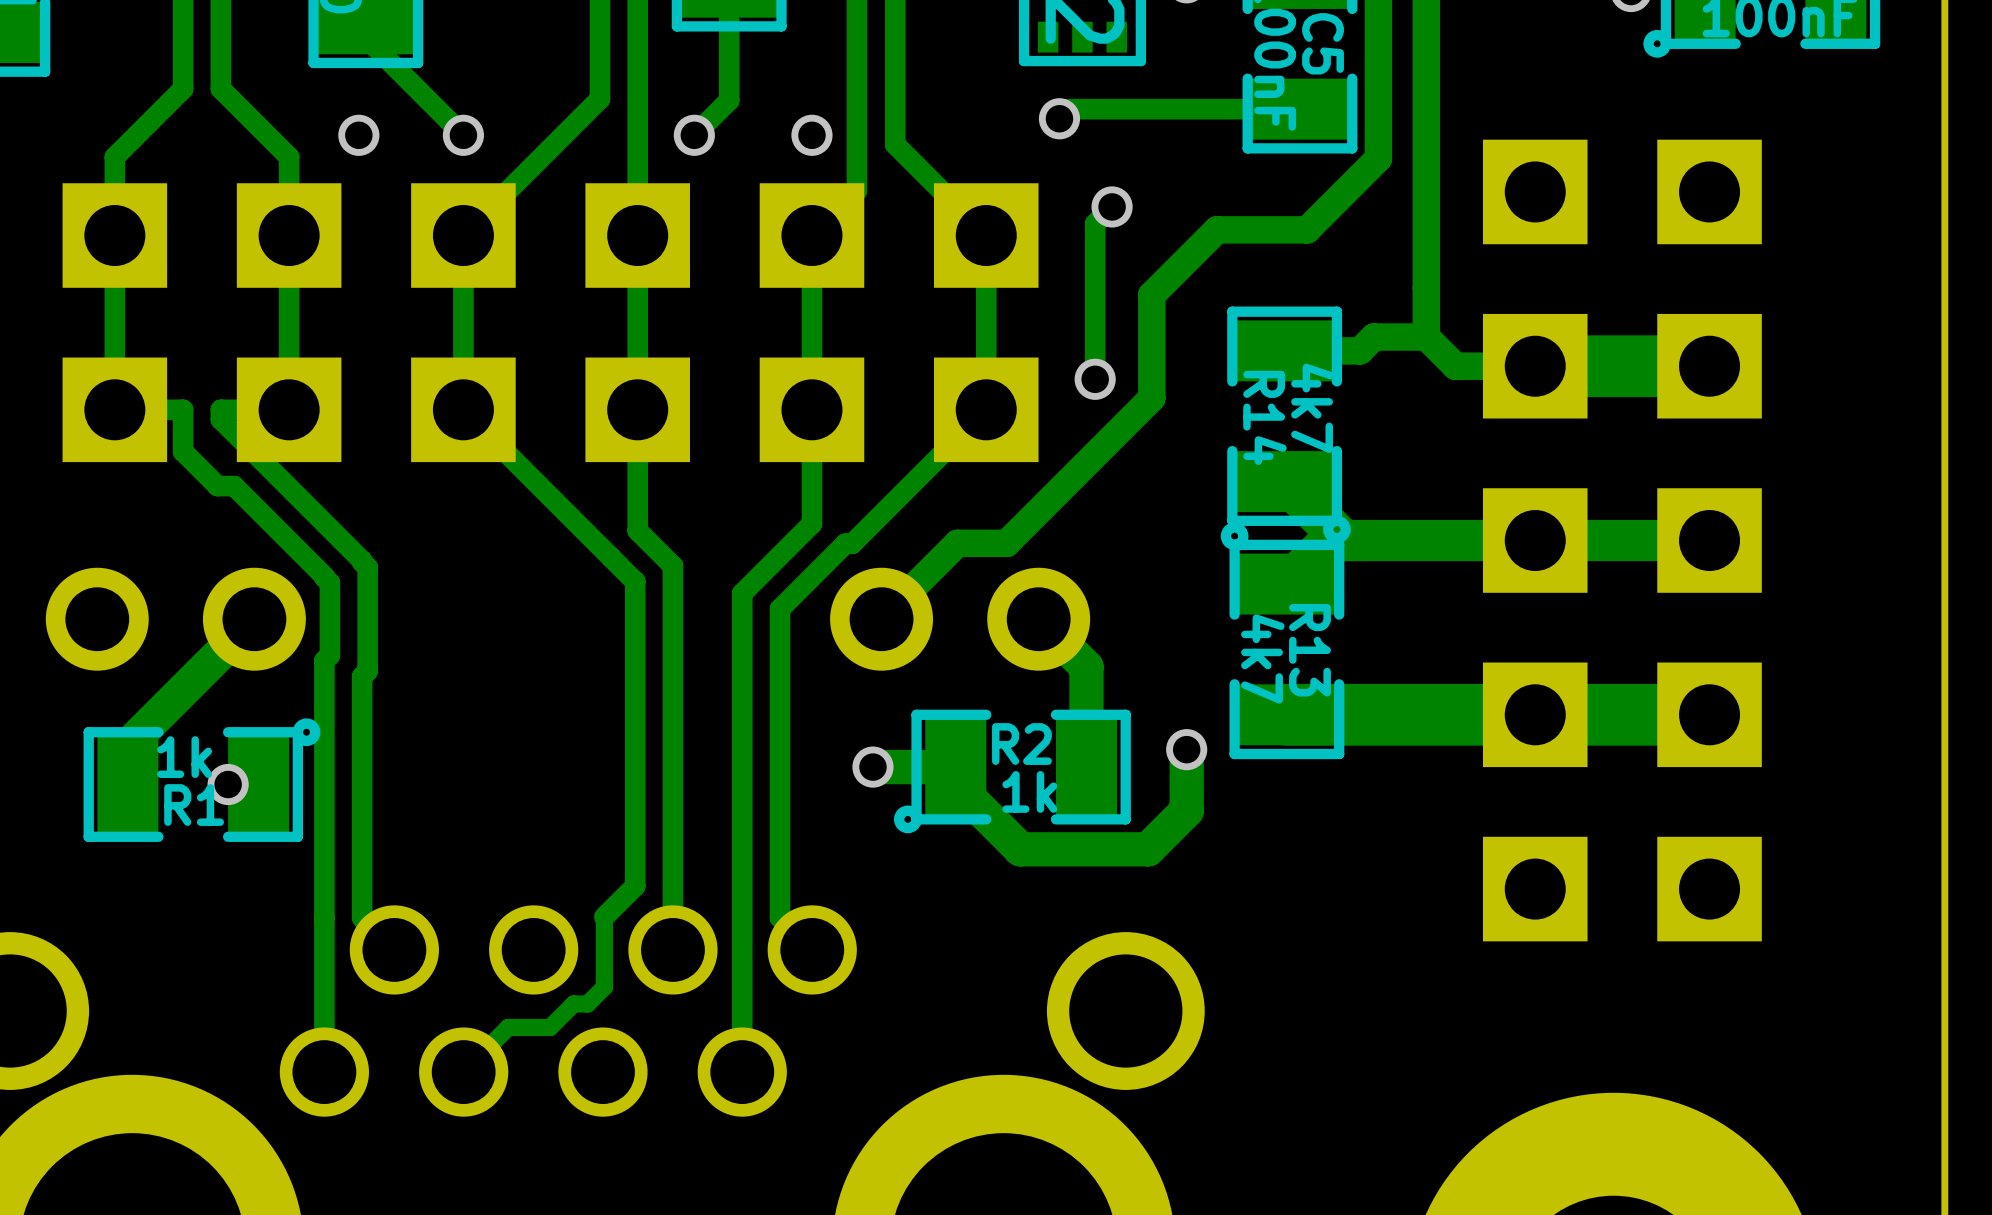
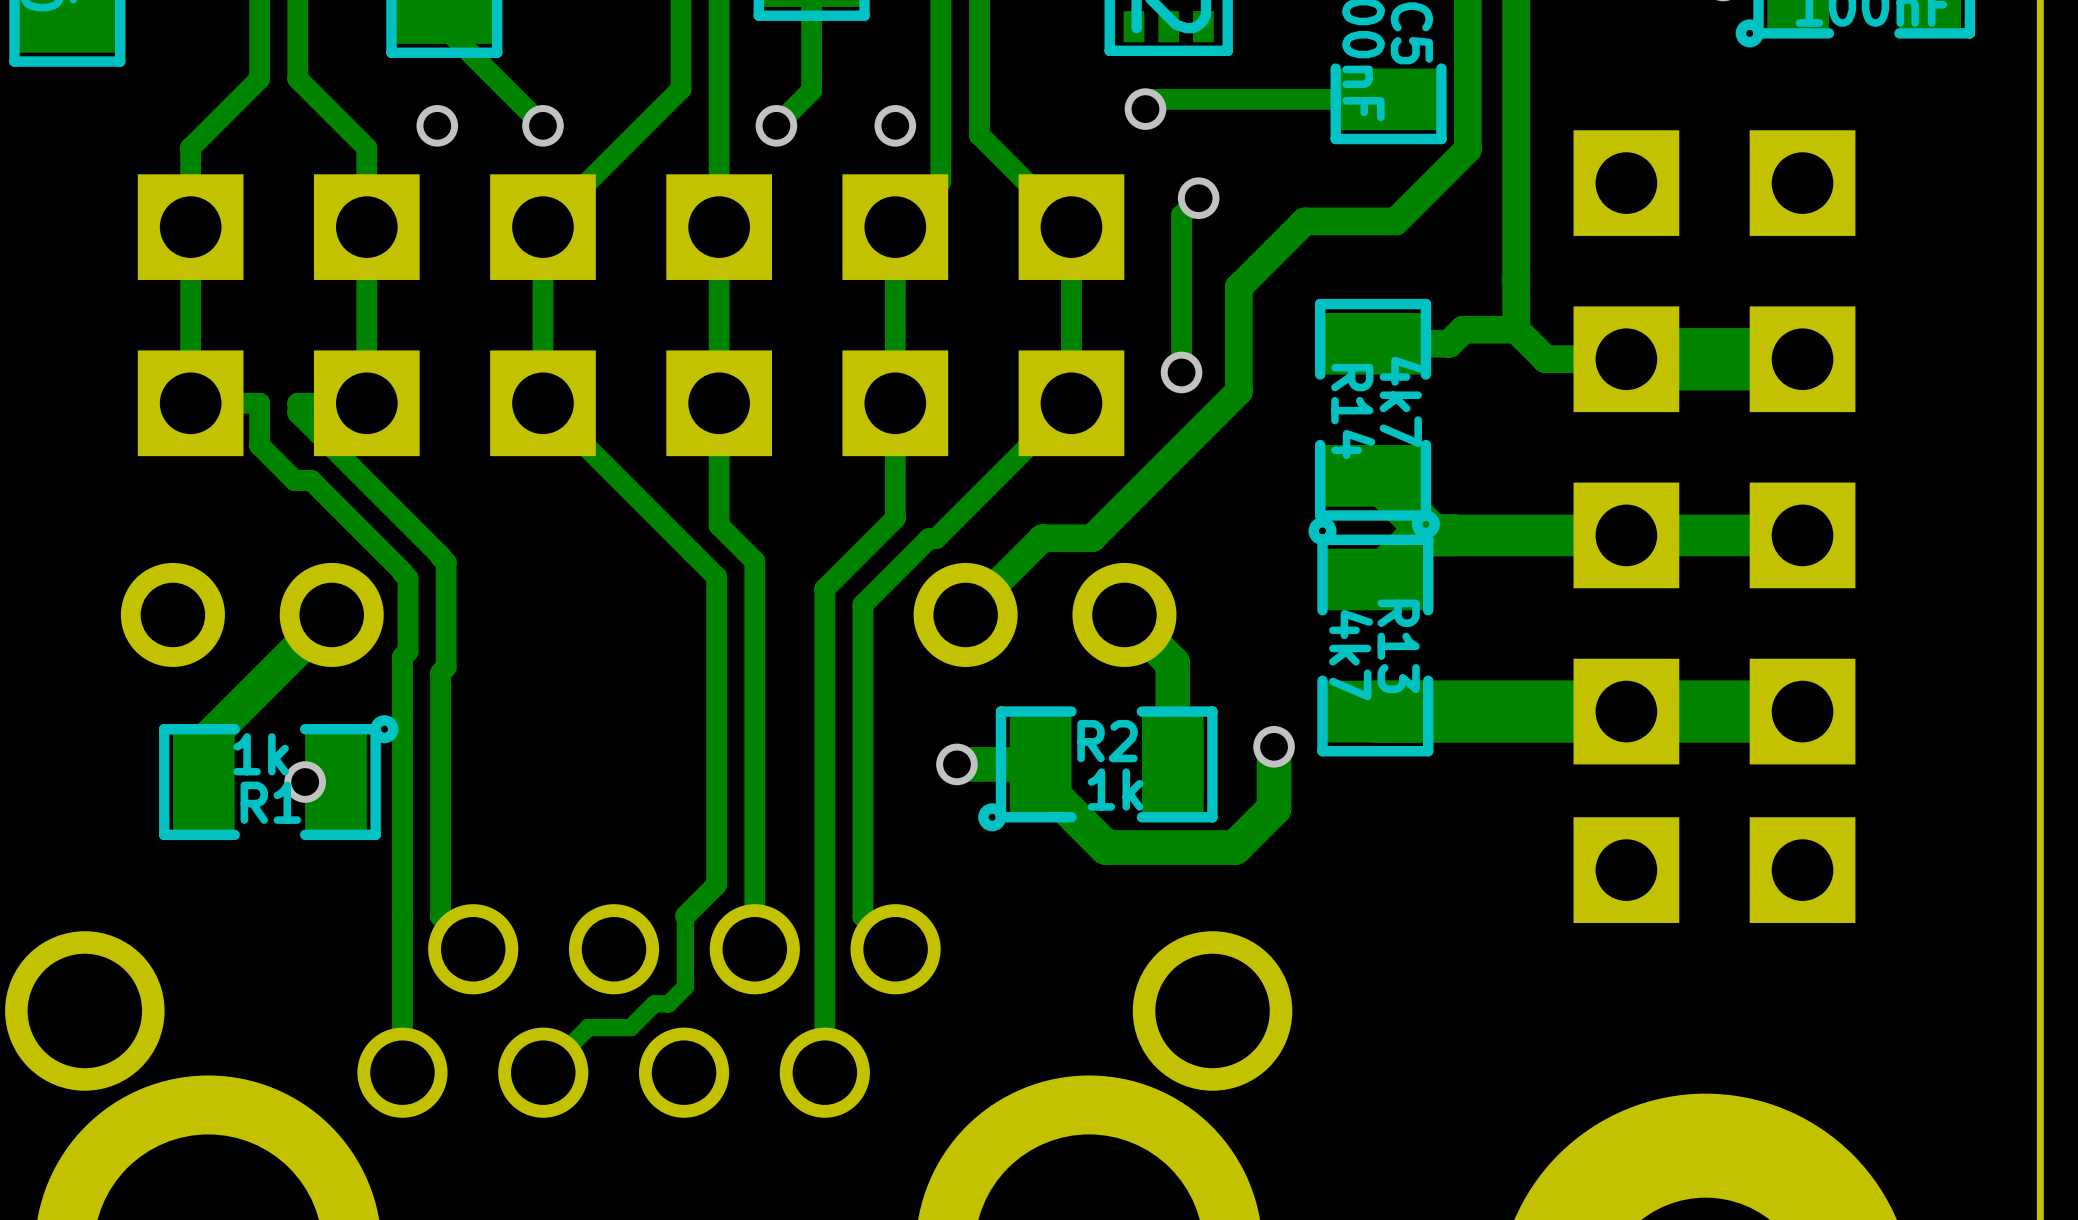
part position: (1622, 889) -> (1714, 870)

